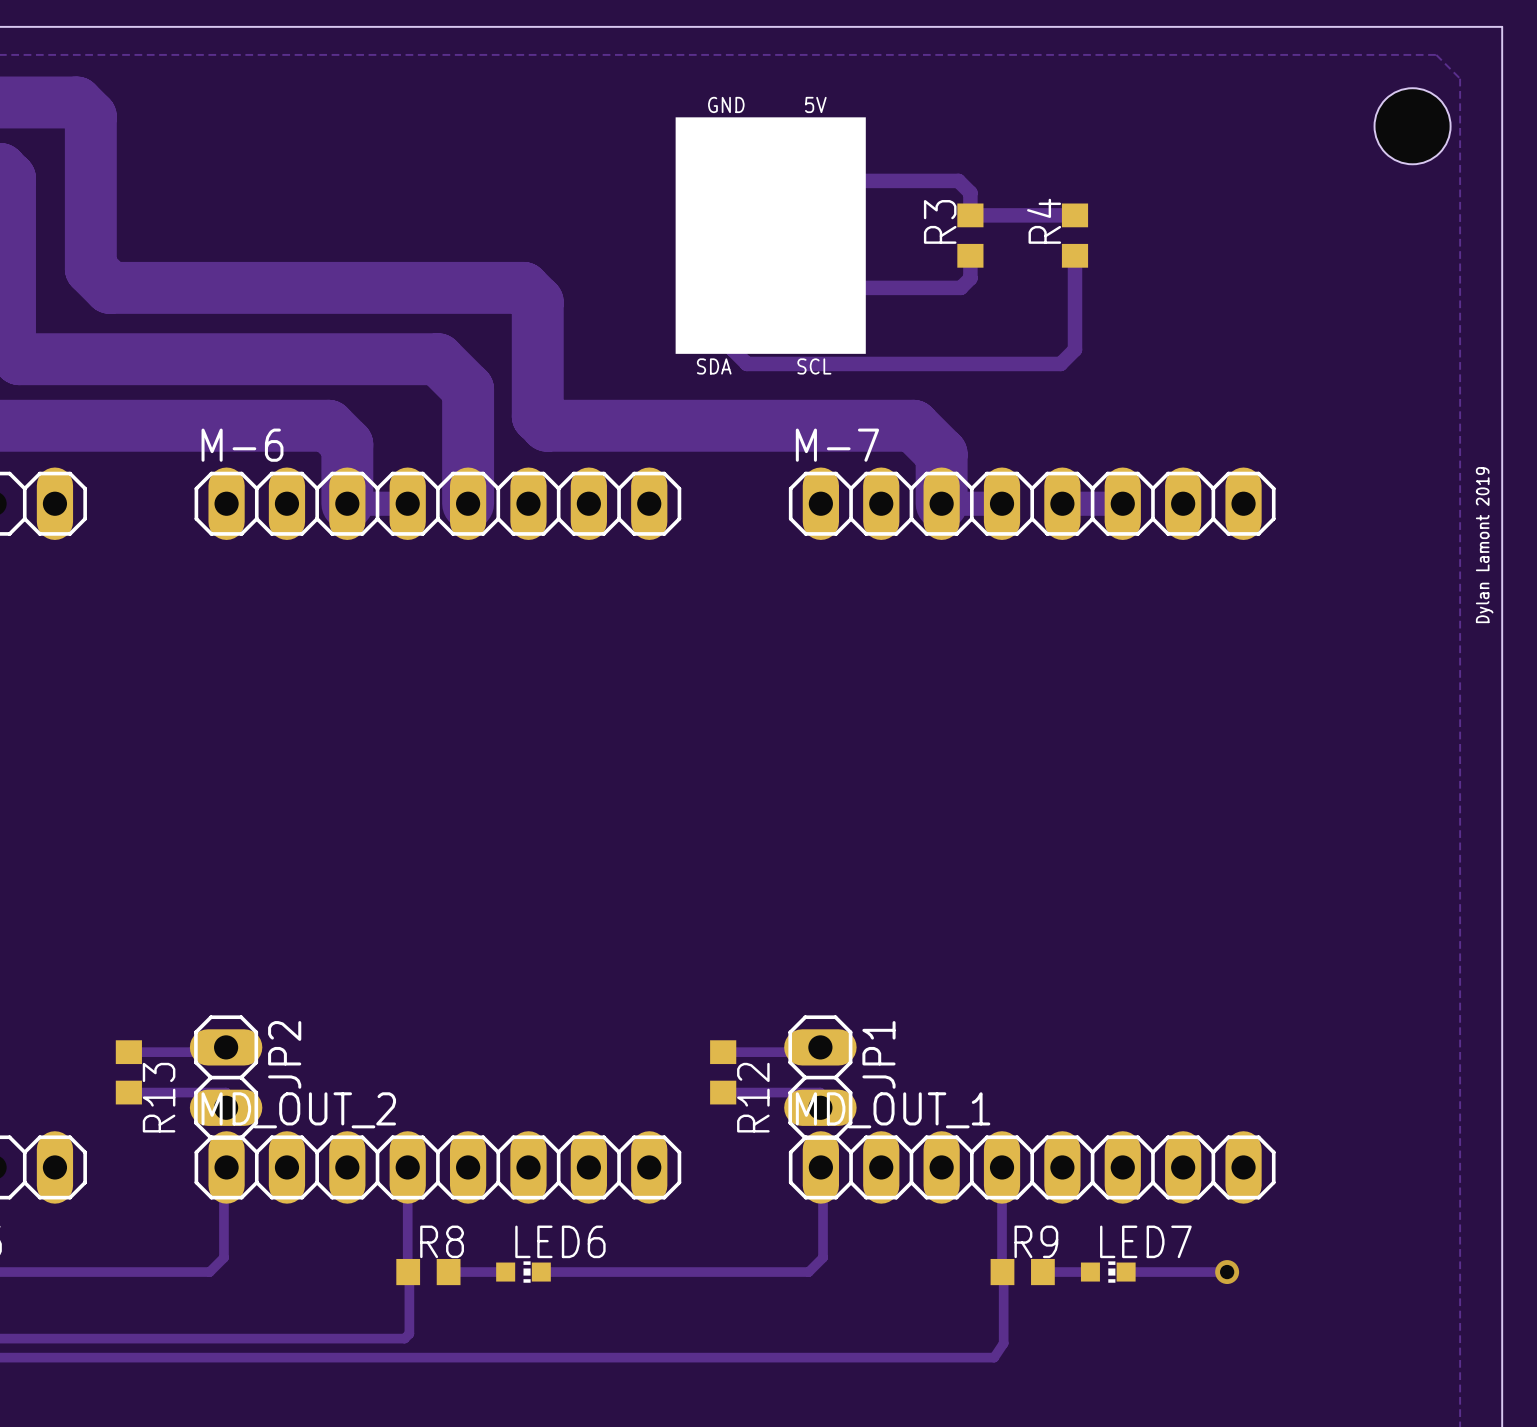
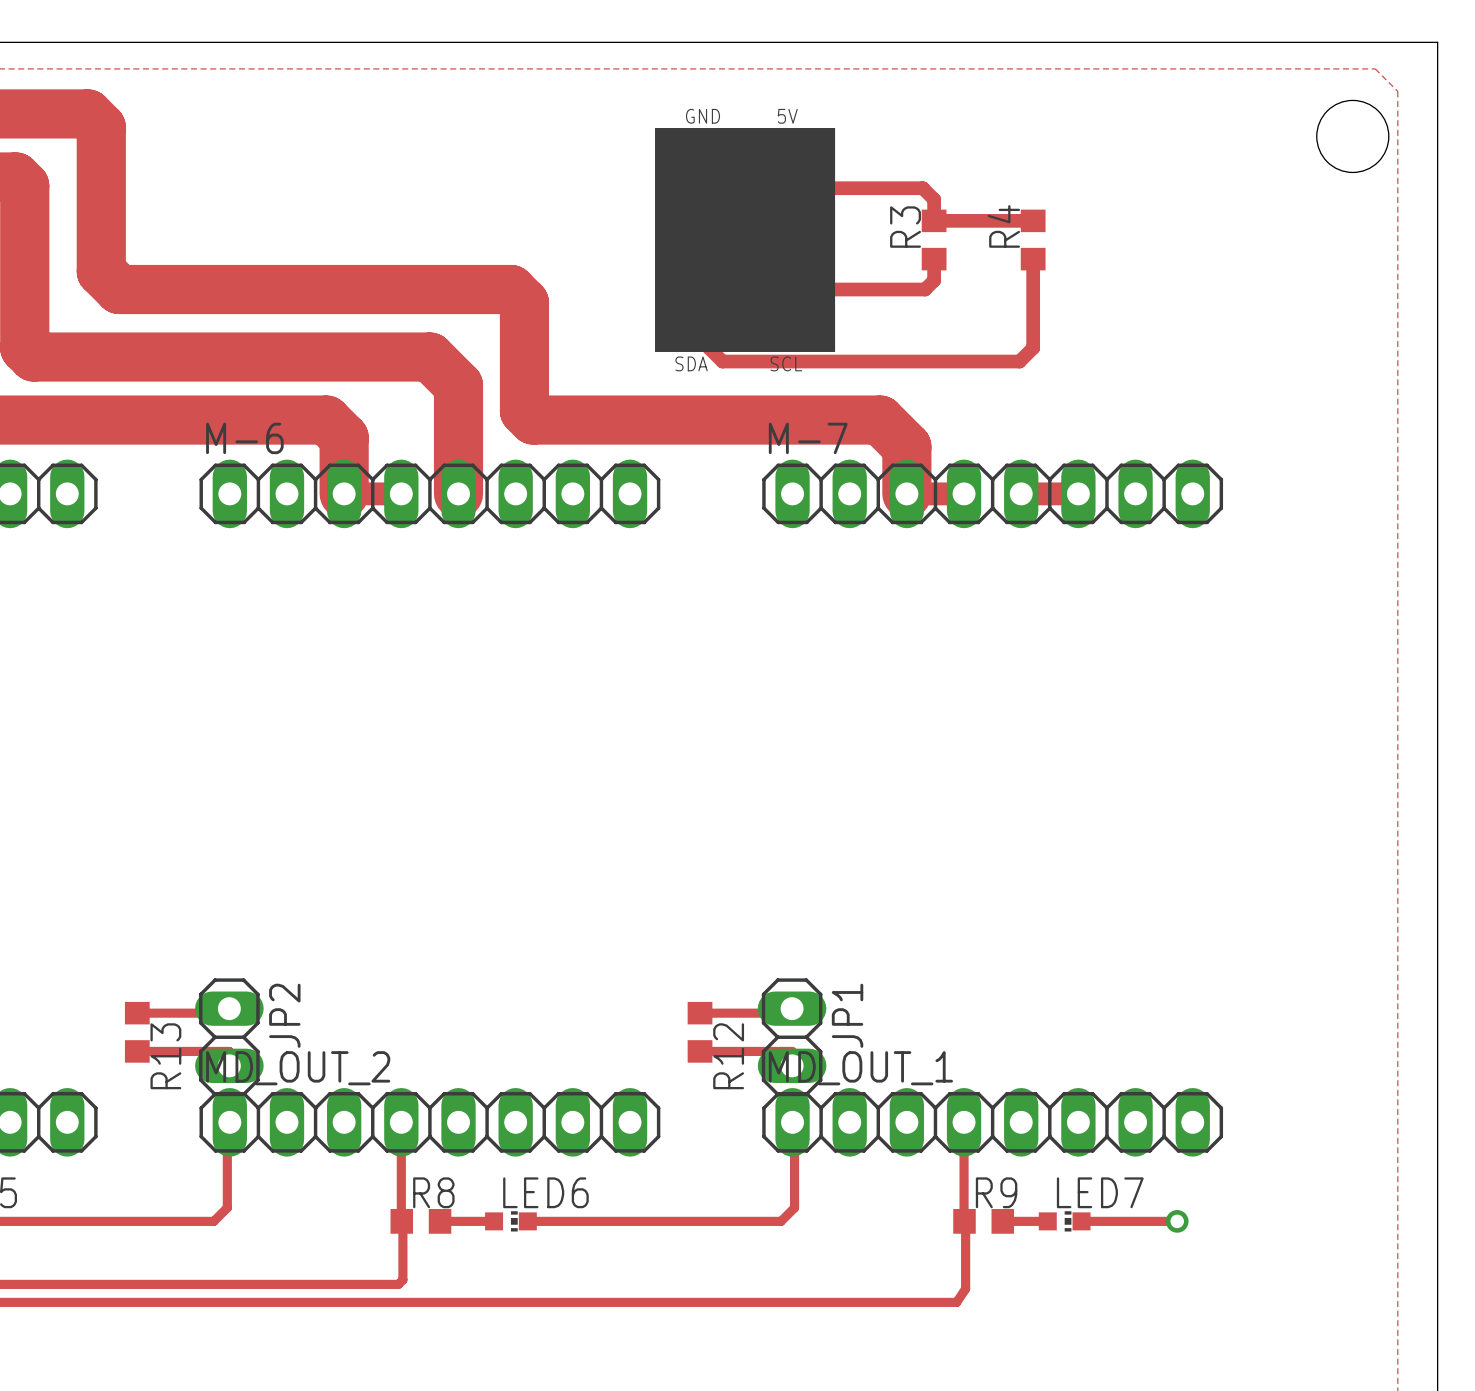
text: Dylan Lamont 2019 (1484, 545) -> none

